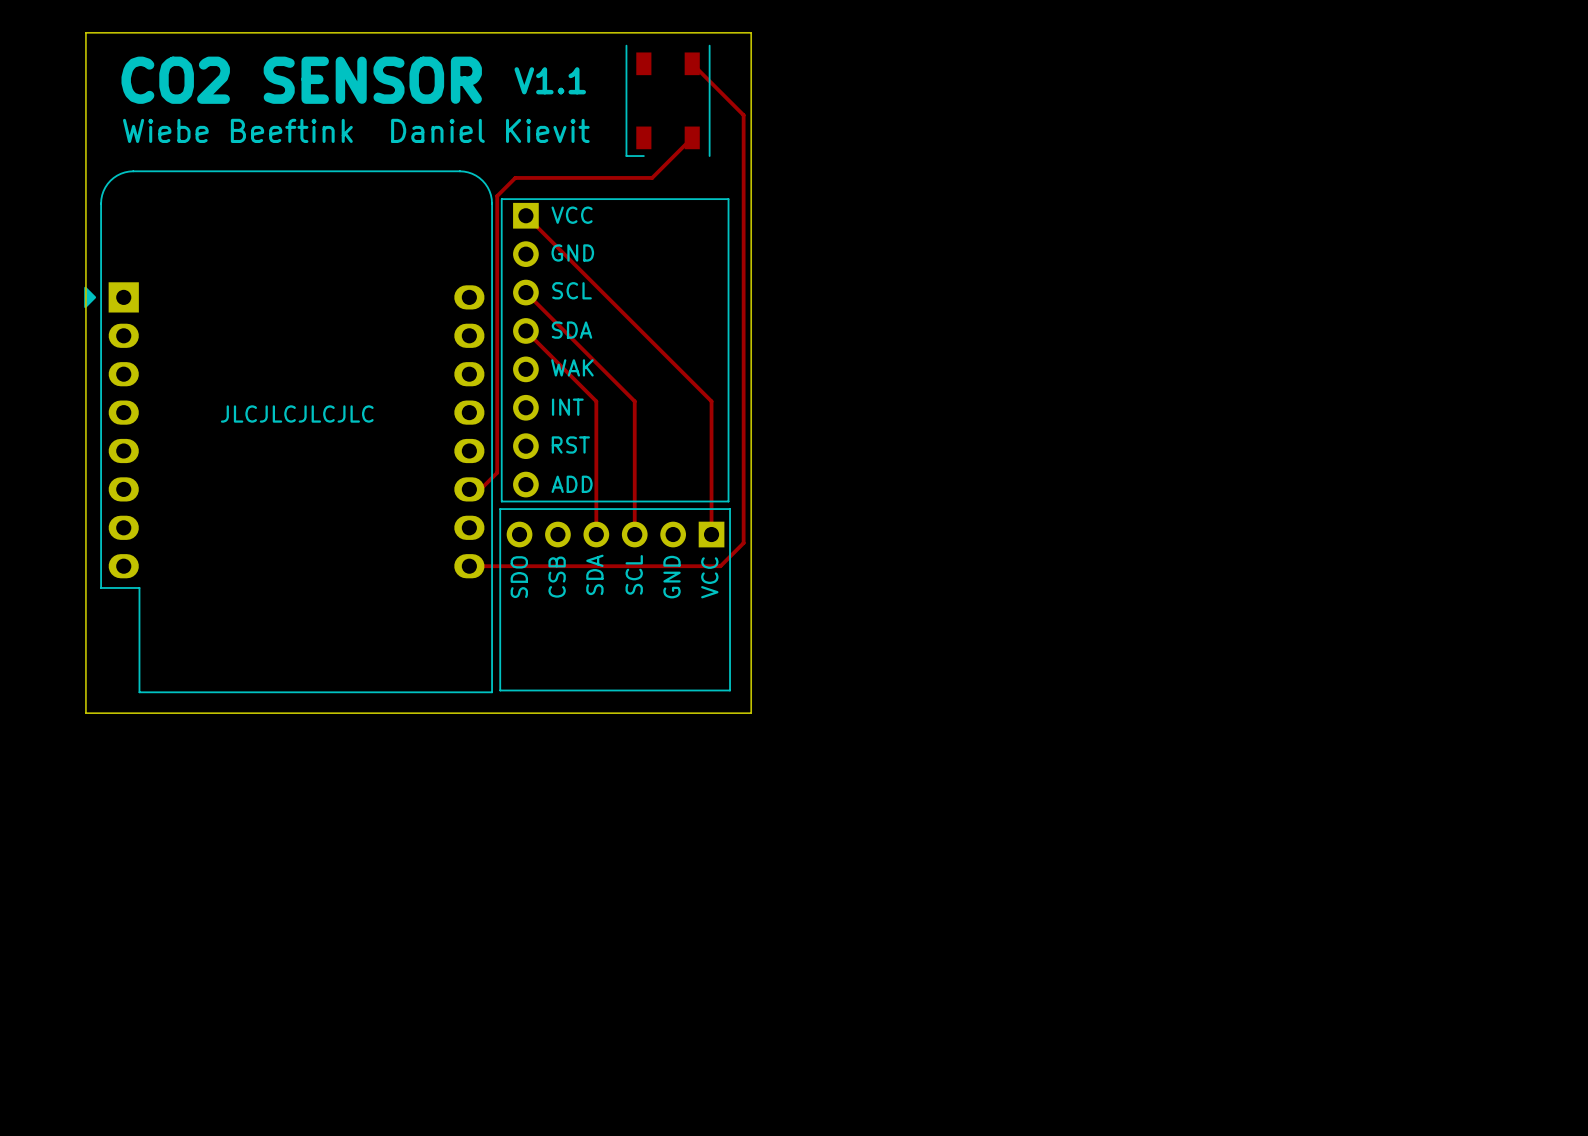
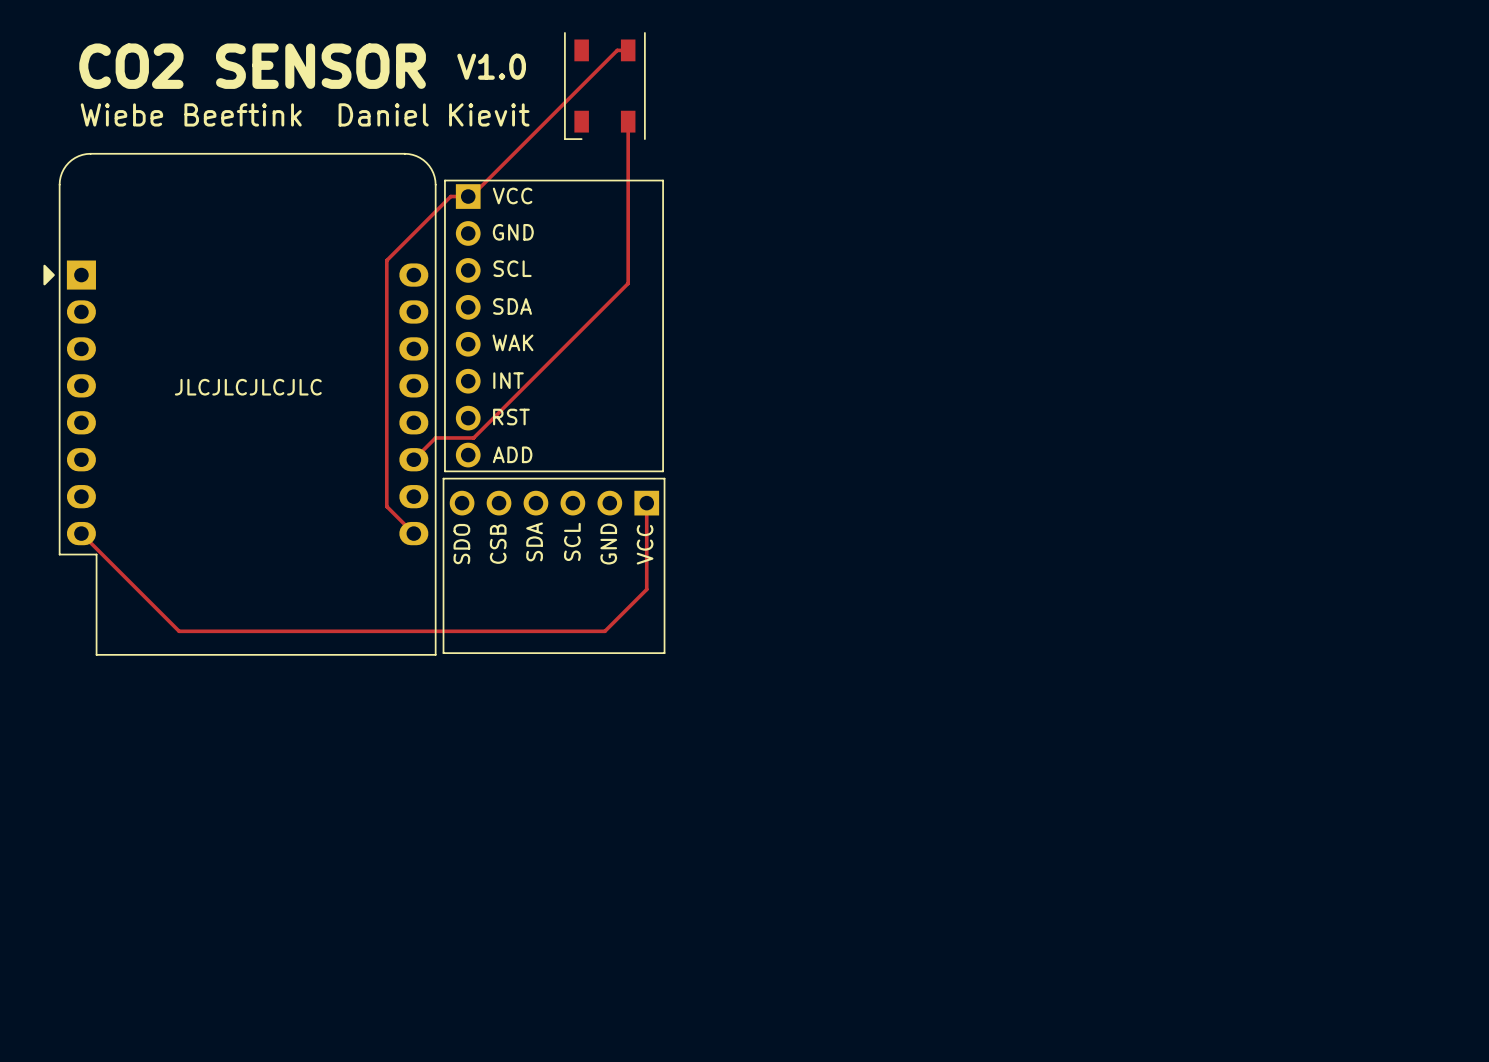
board edge: (85, 32) (85, 713) (751, 713) (751, 32) (85, 32) -> none
track: (692, 63) (743, 115) (743, 543) (720, 566) (469, 566) -> (468, 196) (450, 196) (386, 260) (386, 506) (413, 533)
track: none -> (628, 50) (617, 50) (471, 196)
text: V1.1 (550, 80) -> V1.0 (491, 66)
track: (692, 137) (652, 177) (515, 177) (497, 196) (497, 472) (480, 489) (469, 489) -> (628, 121) (628, 283) (473, 437) (435, 437) (413, 459)
track: (525, 215) (711, 401) (711, 534) -> (81, 533) (179, 631) (604, 631) (646, 589) (646, 503)
track: (525, 292) (634, 401) (634, 534) -> none
track: (525, 330) (596, 401) (596, 534) -> none

